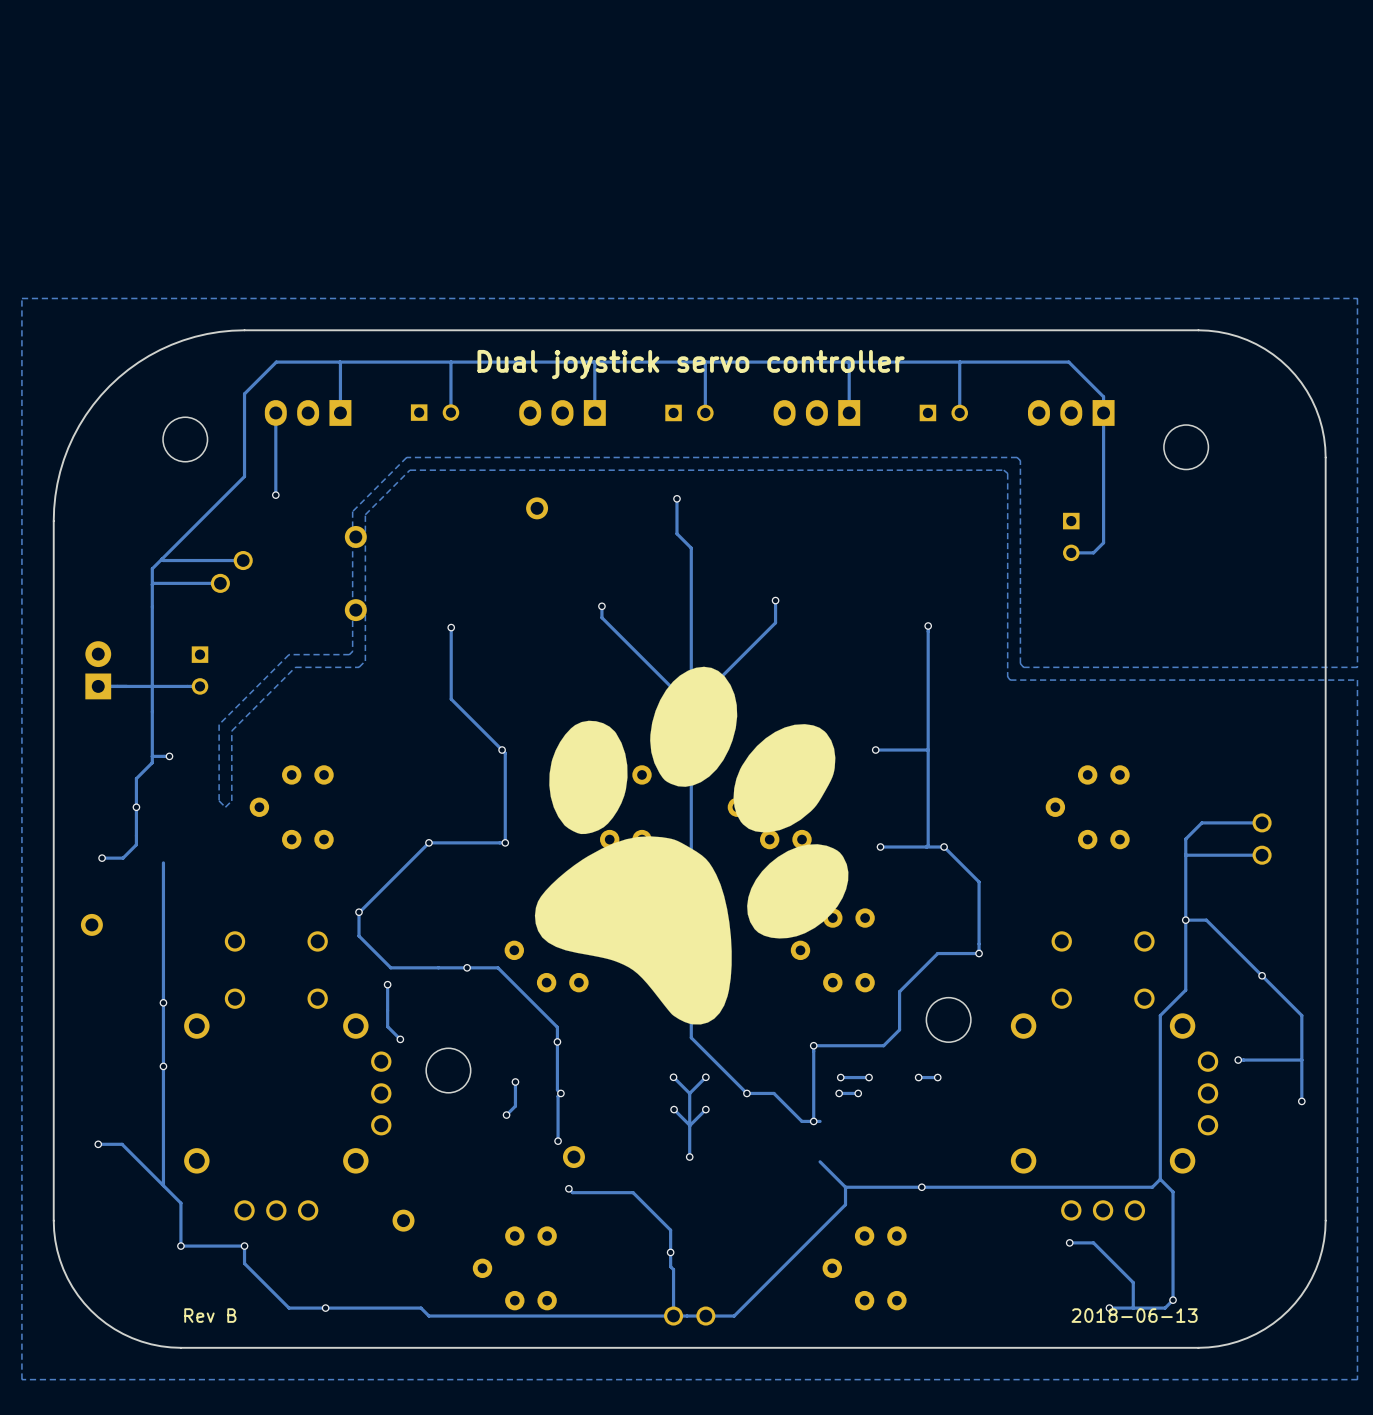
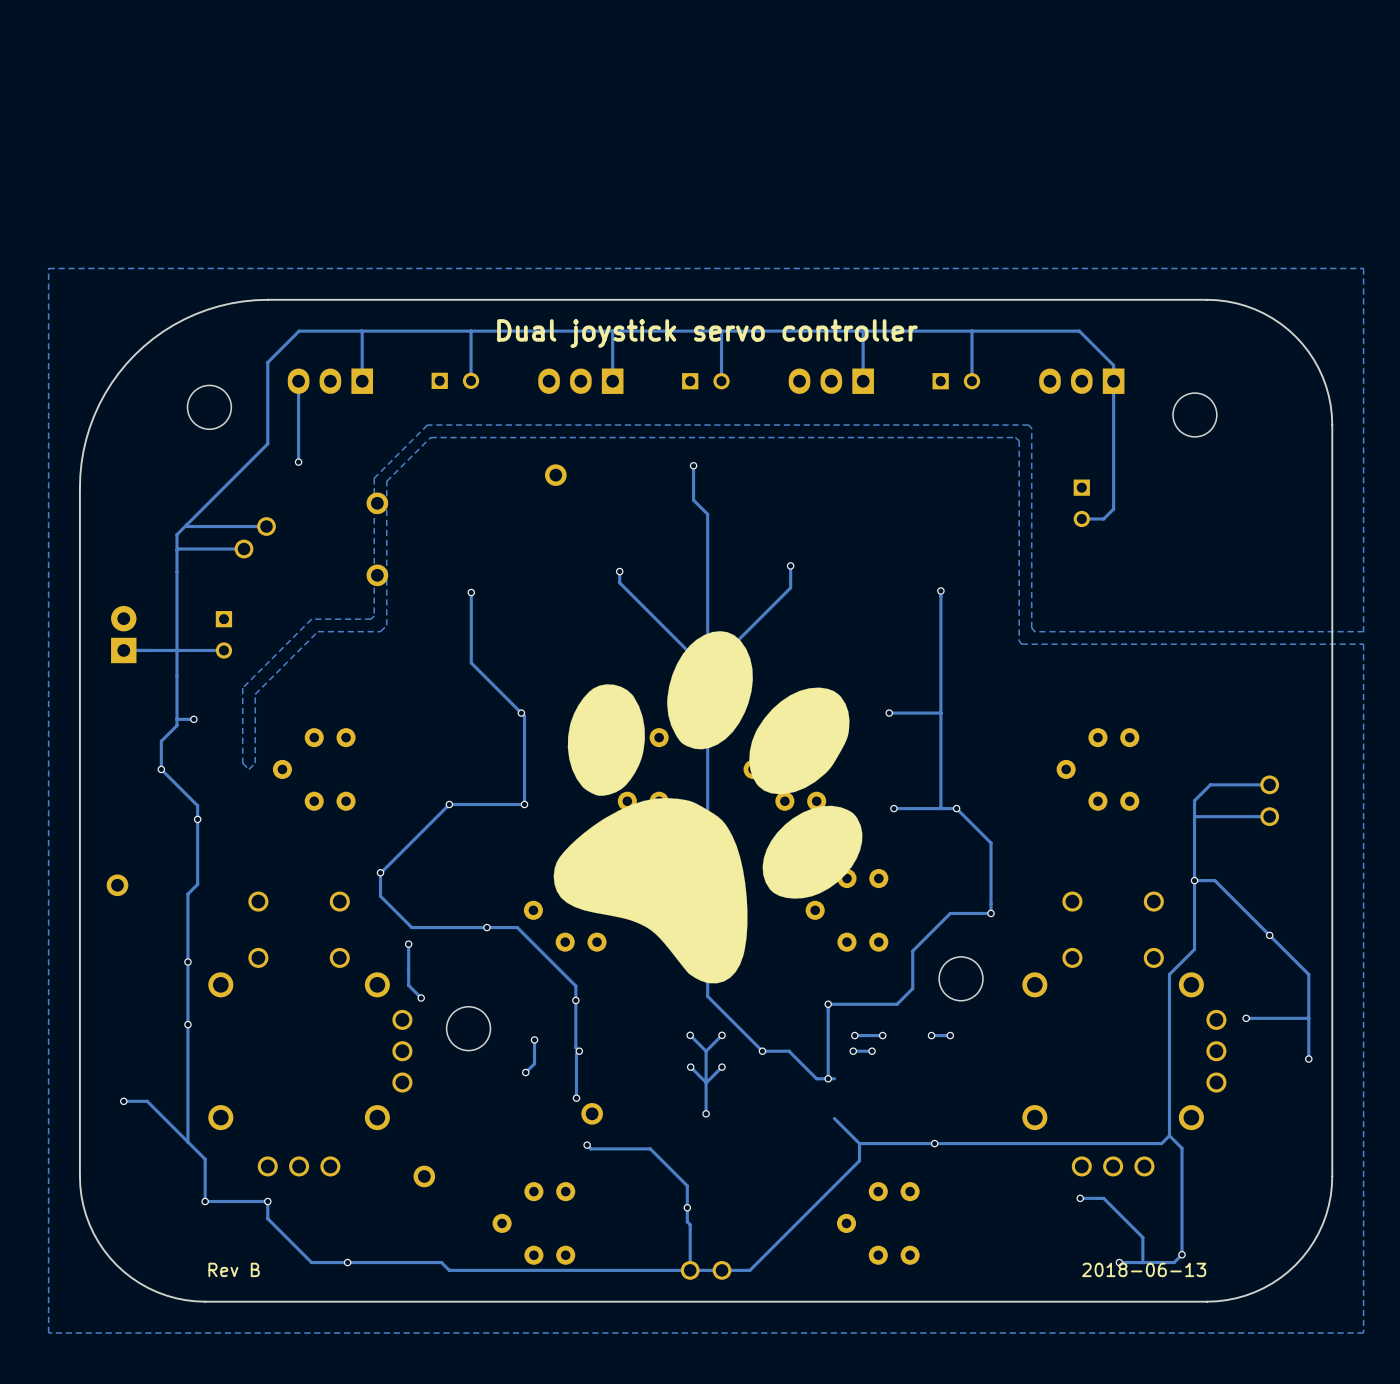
track: (136, 807) (136, 844) (123, 858) (102, 858) -> none
via position: (102, 858) -> (197, 819)
track: (163, 862) (163, 933) -> (161, 769) (197, 805) (197, 884) (187, 894)

